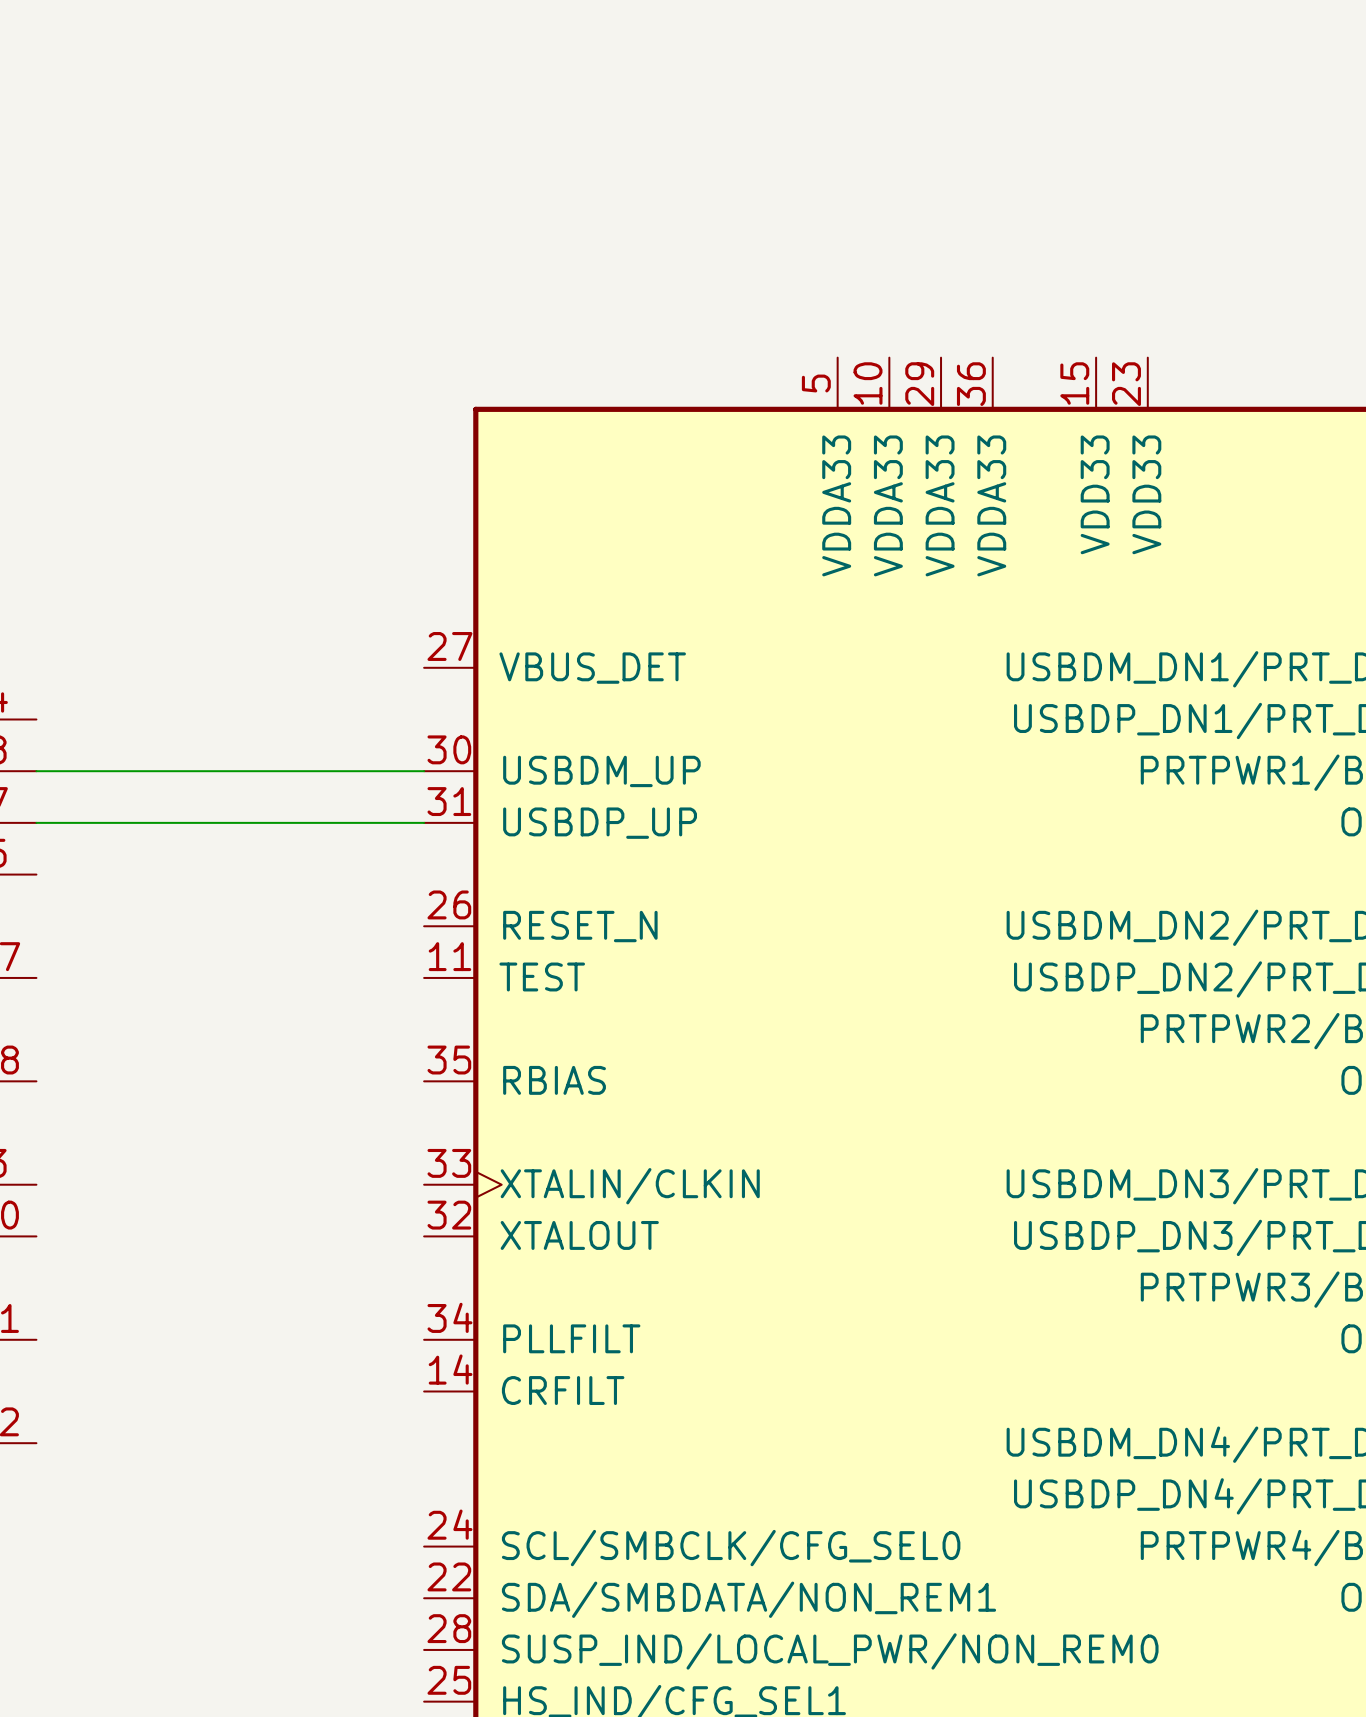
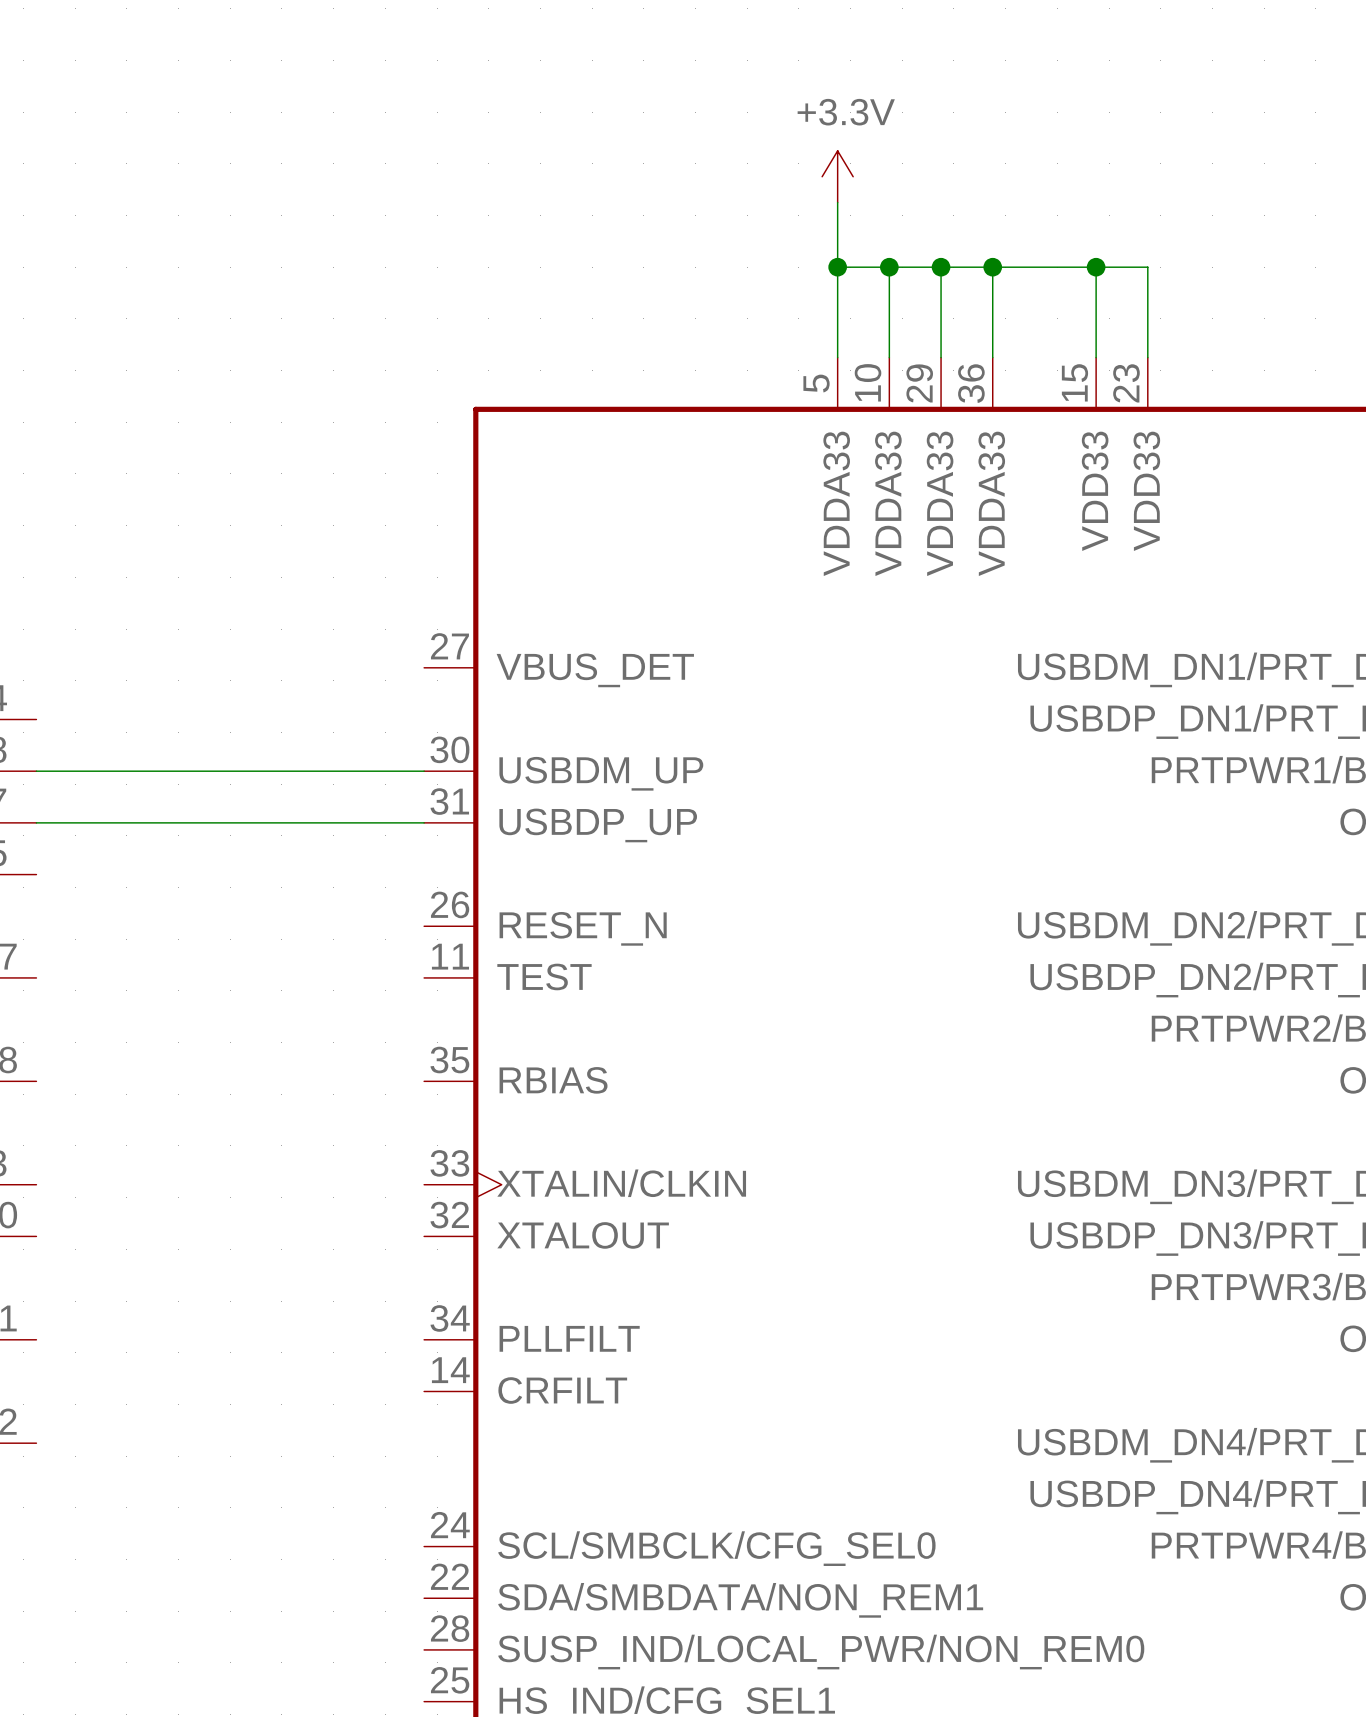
power symbol: none -> +3.3V (837, 176)
wire: none -> (837, 202) (837, 357)
wire: none -> (837, 267) (1147, 267) (1147, 357)
junction: none -> (837, 267)
wire: none -> (889, 267) (889, 357)
junction: none -> (889, 267)
wire: none -> (941, 267) (941, 357)
junction: none -> (941, 267)
wire: none -> (992, 267) (992, 357)
junction: none -> (992, 267)
wire: none -> (1096, 267) (1096, 357)
junction: none -> (1096, 267)

